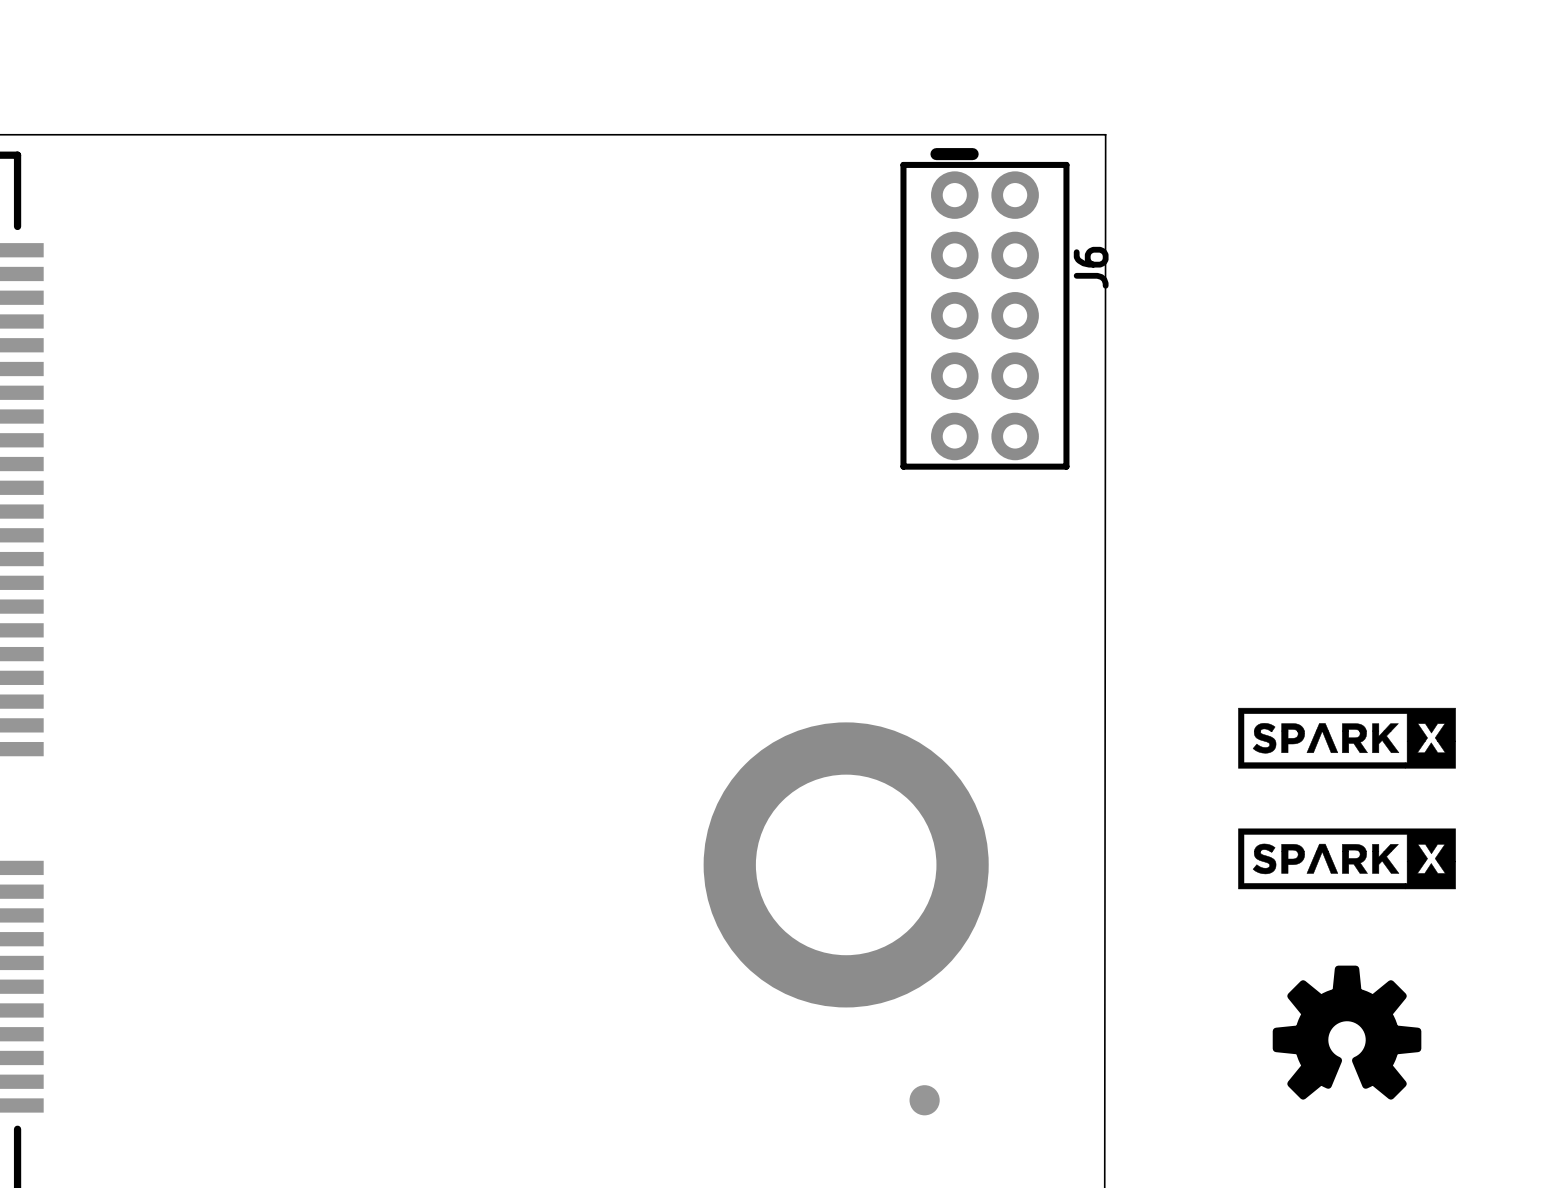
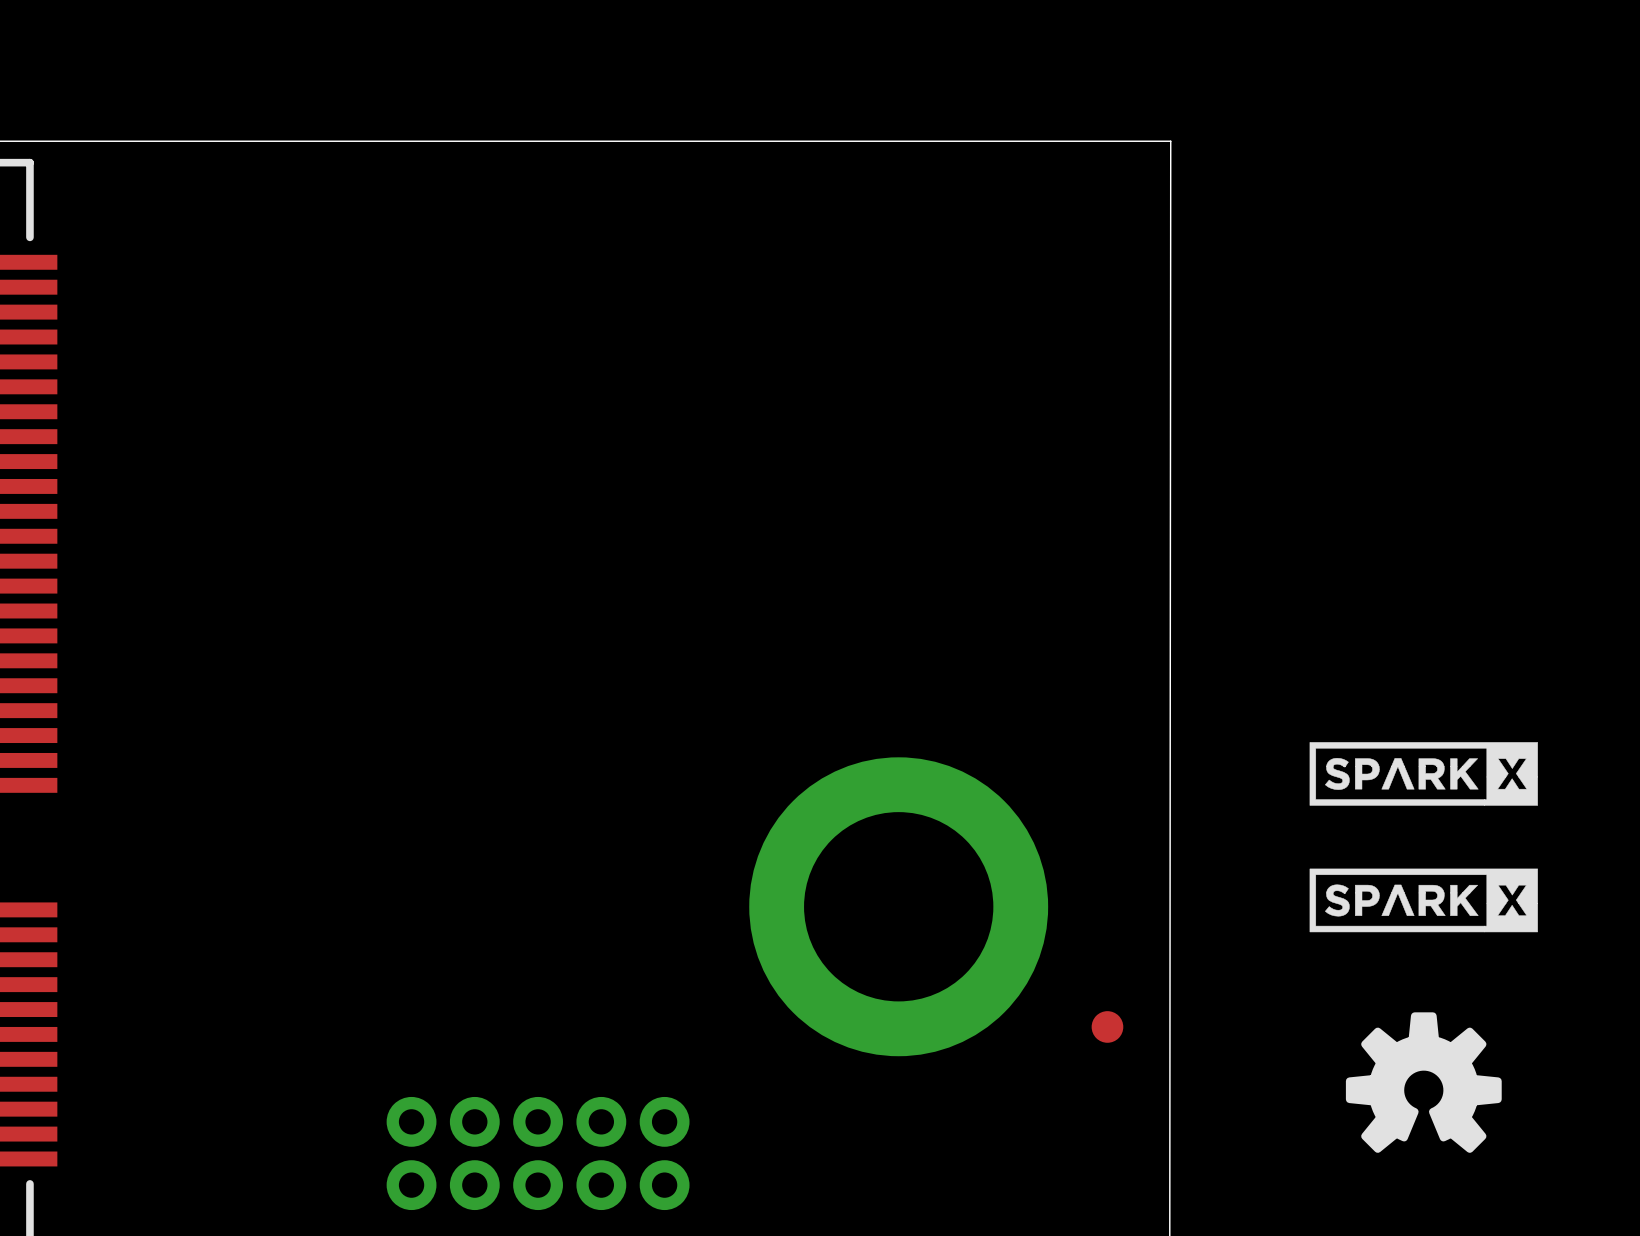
J6 side: top (984, 308) -> bottom (538, 1153)
part position: (924, 1100) -> (1107, 1026)

